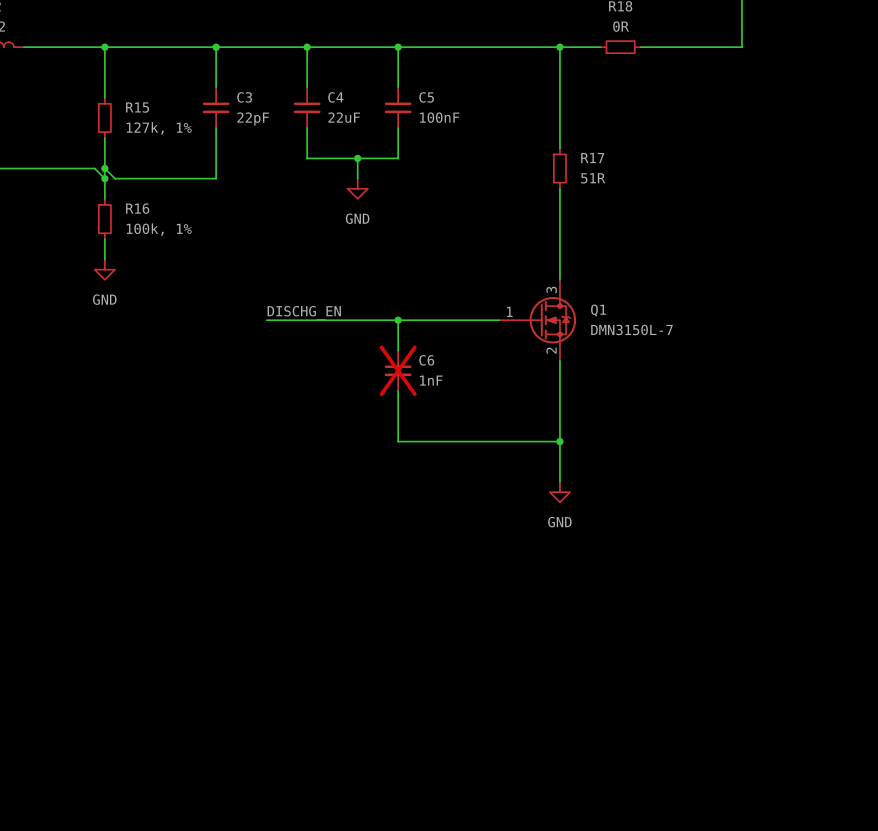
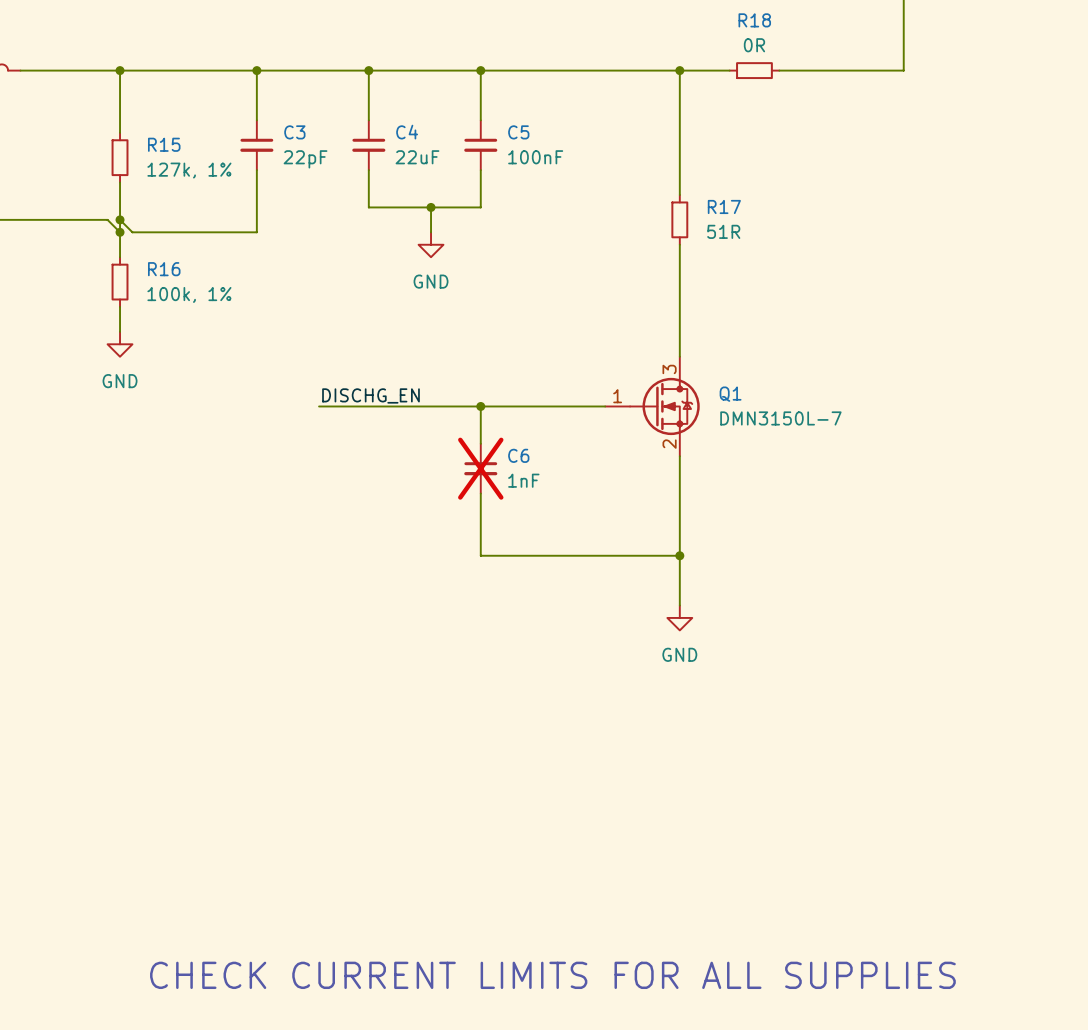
text: none -> CHECK CURRENT LIMITS FOR ALL SUPPLIES (552, 975)

